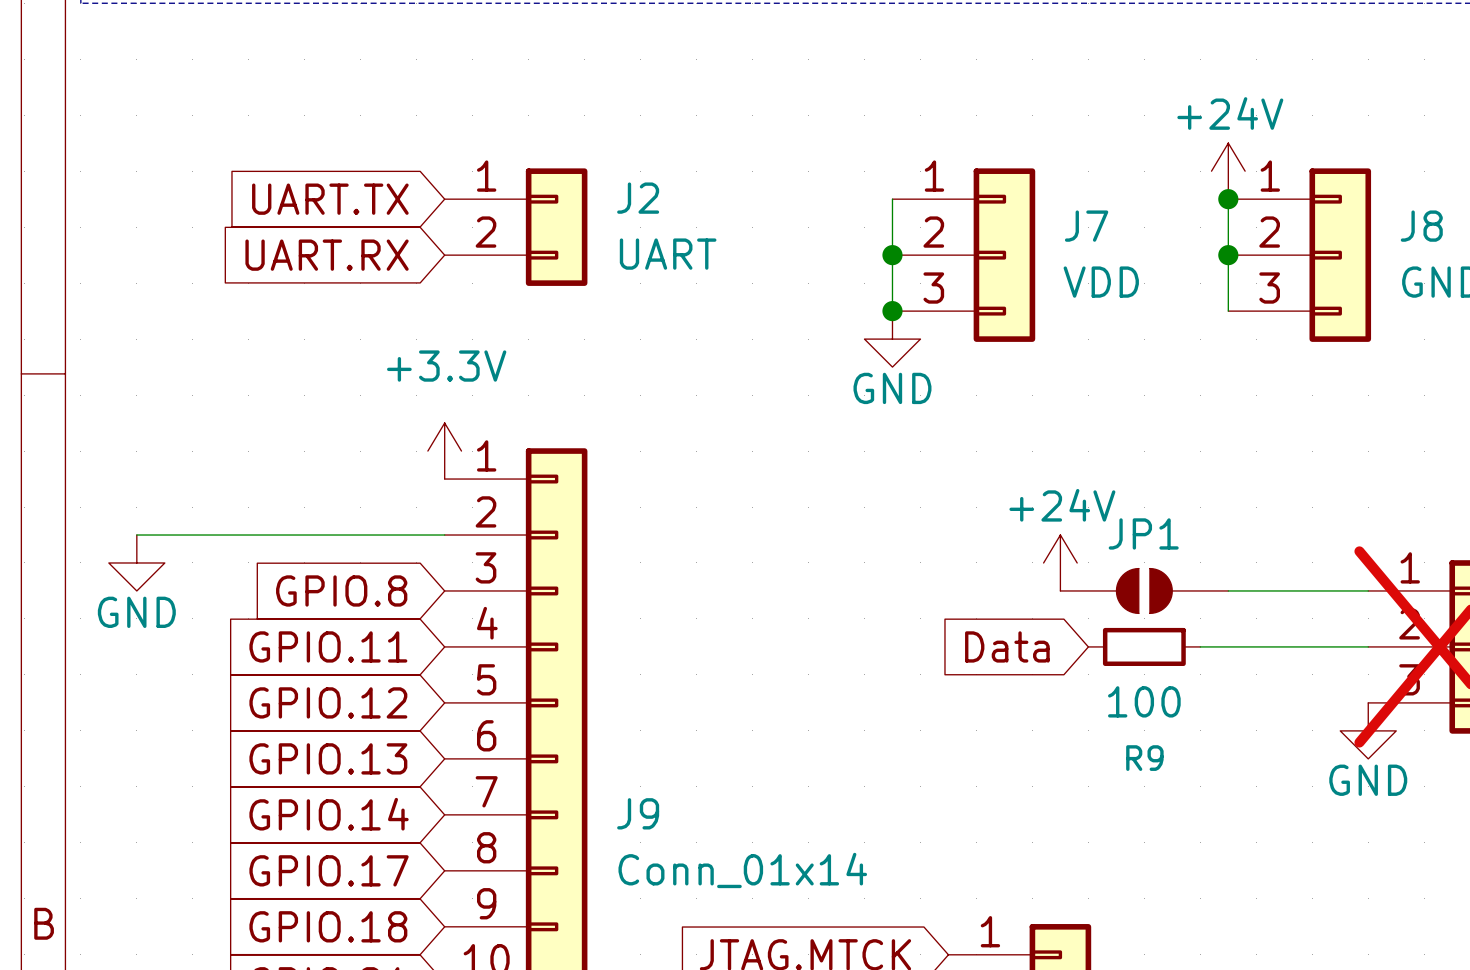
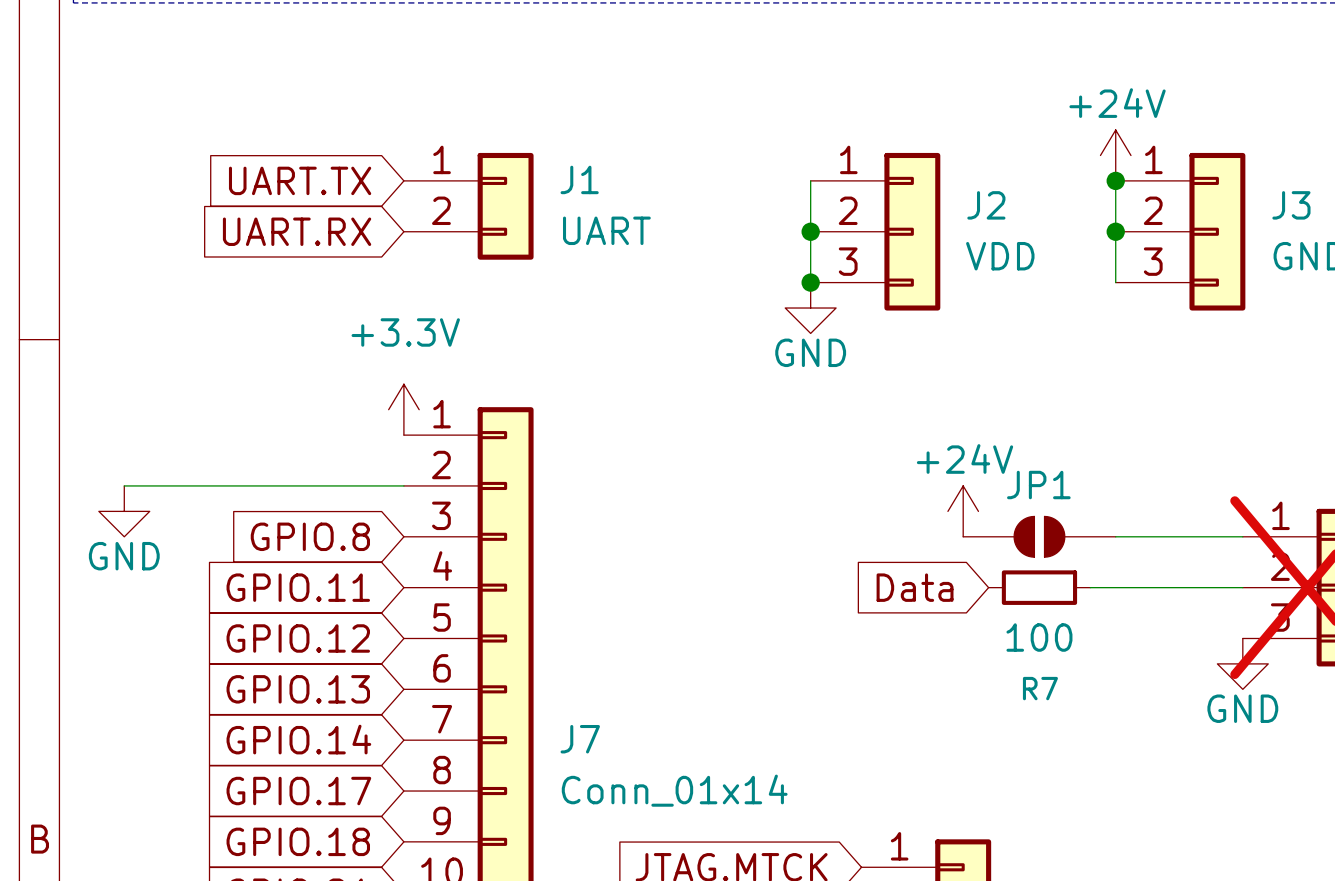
J2 name: J2 (638, 198) -> J1 (579, 179)
J7 name: J7 (1086, 226) -> J2 (986, 205)
J8 name: J8 (1421, 226) -> J3 (1291, 205)
R9 name: R9 (1144, 758) -> R7 (1040, 688)
J9 name: J9 (638, 813) -> J7 (580, 739)

